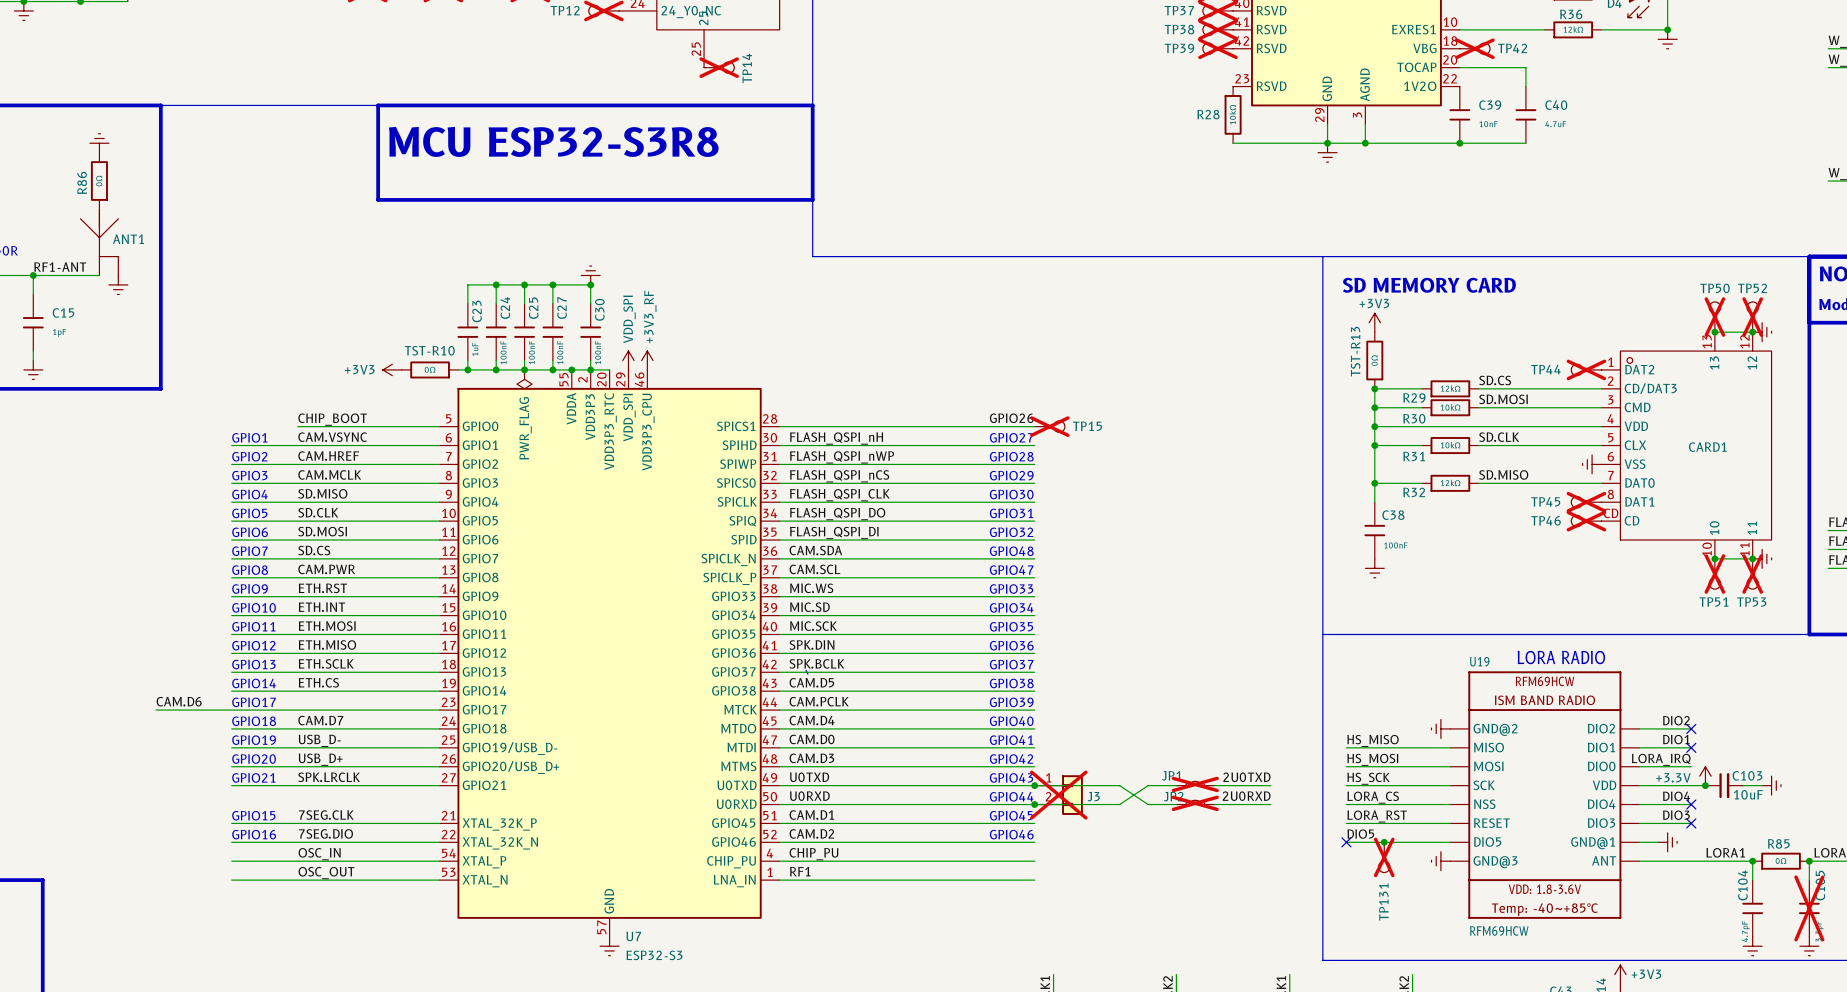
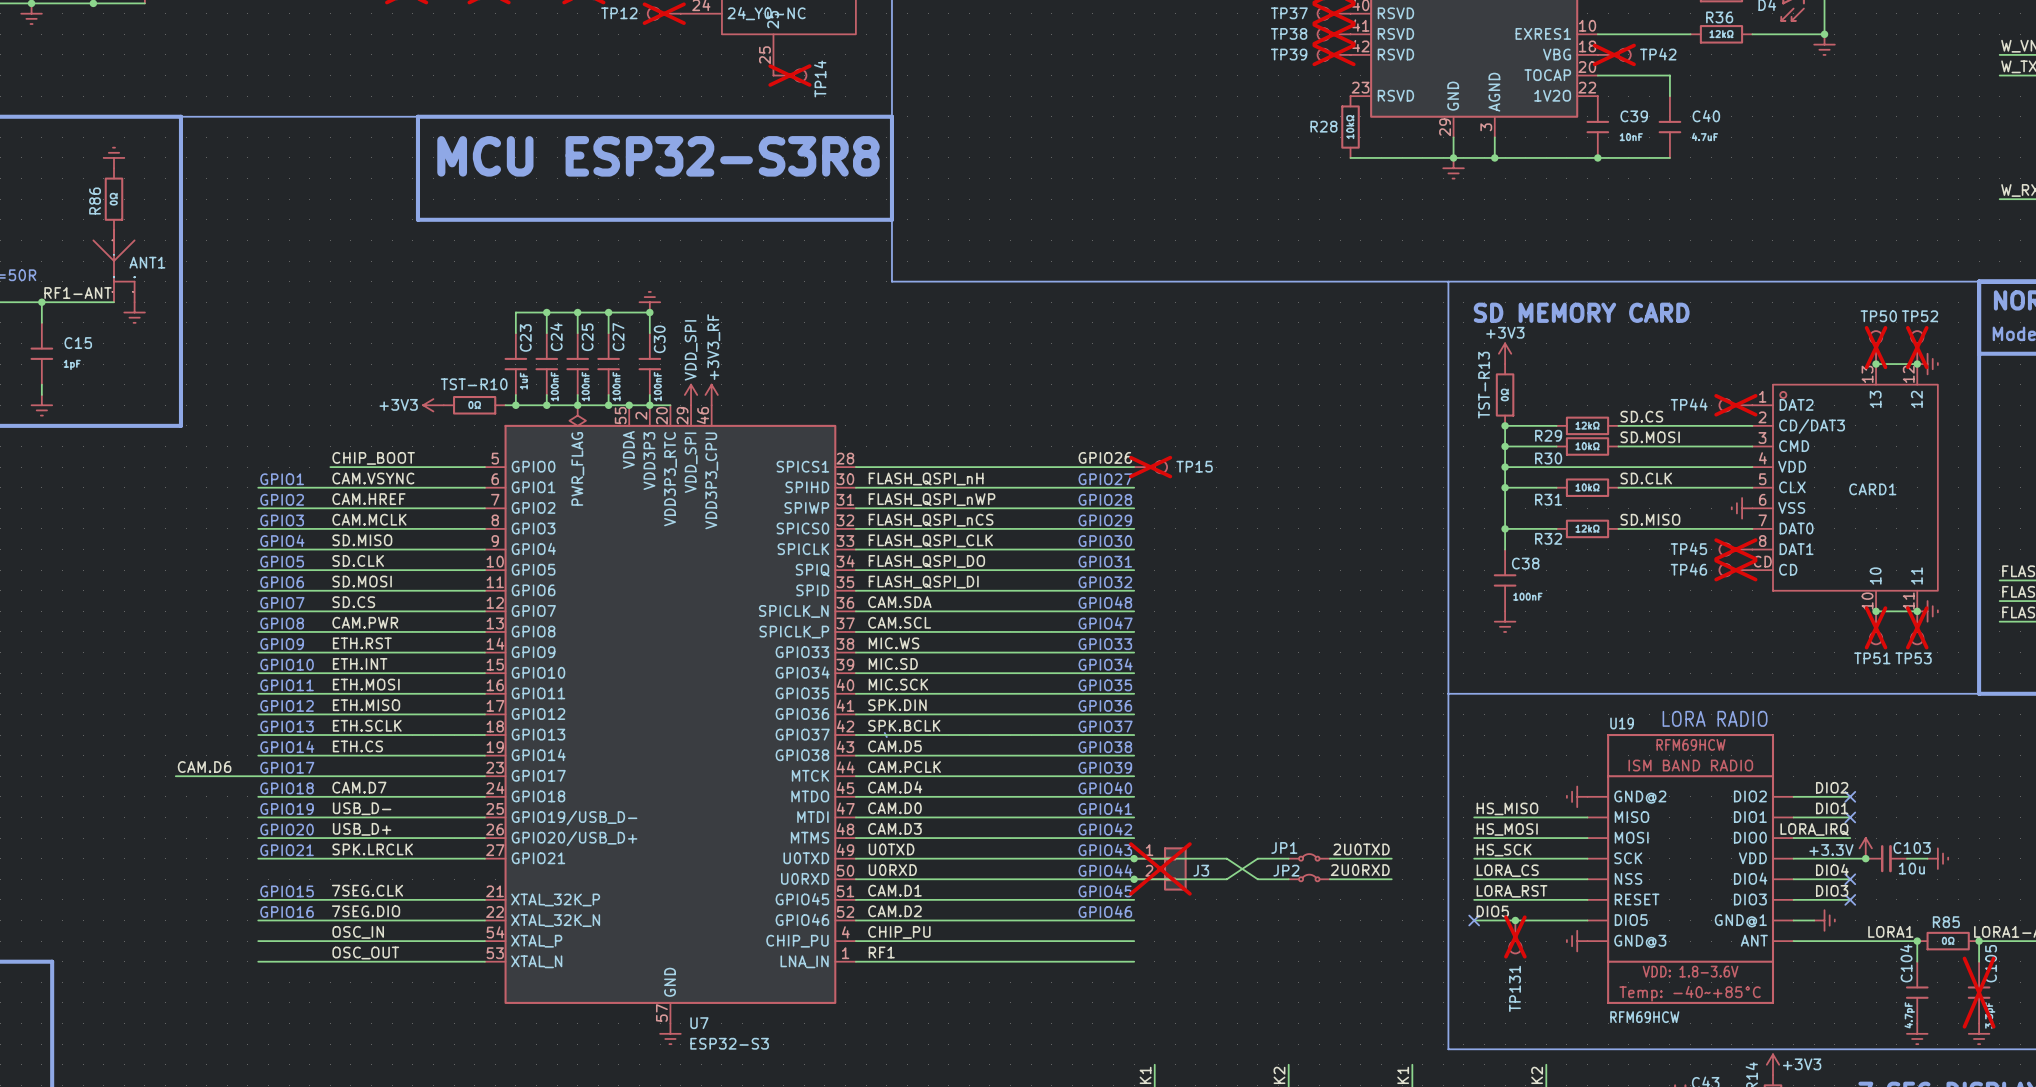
JP1 do-not-place cross: (1195, 784) -> none
C103 value: 10uF (1748, 794) -> 10u (1911, 868)
JP2 do-not-place cross: (1195, 803) -> none

